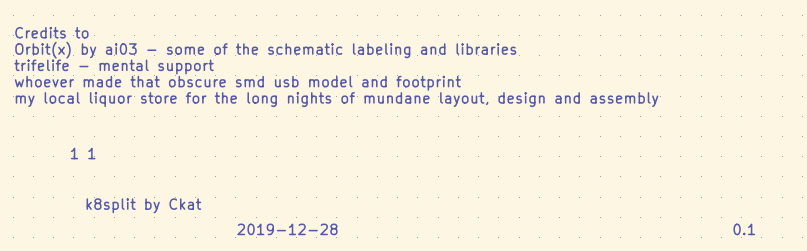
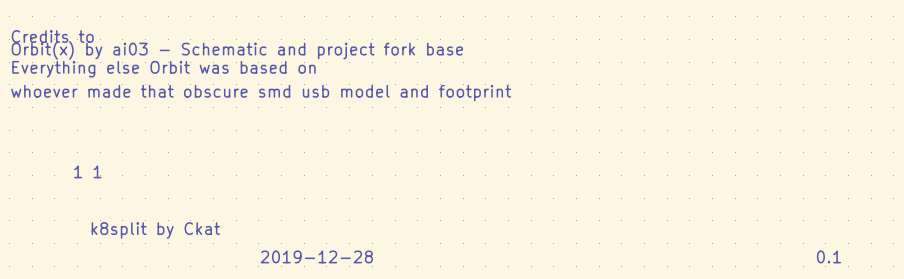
text: Orbit(x) by ai03 - some of the schematic labeling and libraries (265, 50) -> Orbit(x) by ai03 - Schematic and project fork base (237, 50)
text: trifelife - mental support (114, 67) -> Everything else Orbit was based on (163, 69)
text: my local liquor store for the long nights of mundane layout, design and assembly (337, 99) -> none

